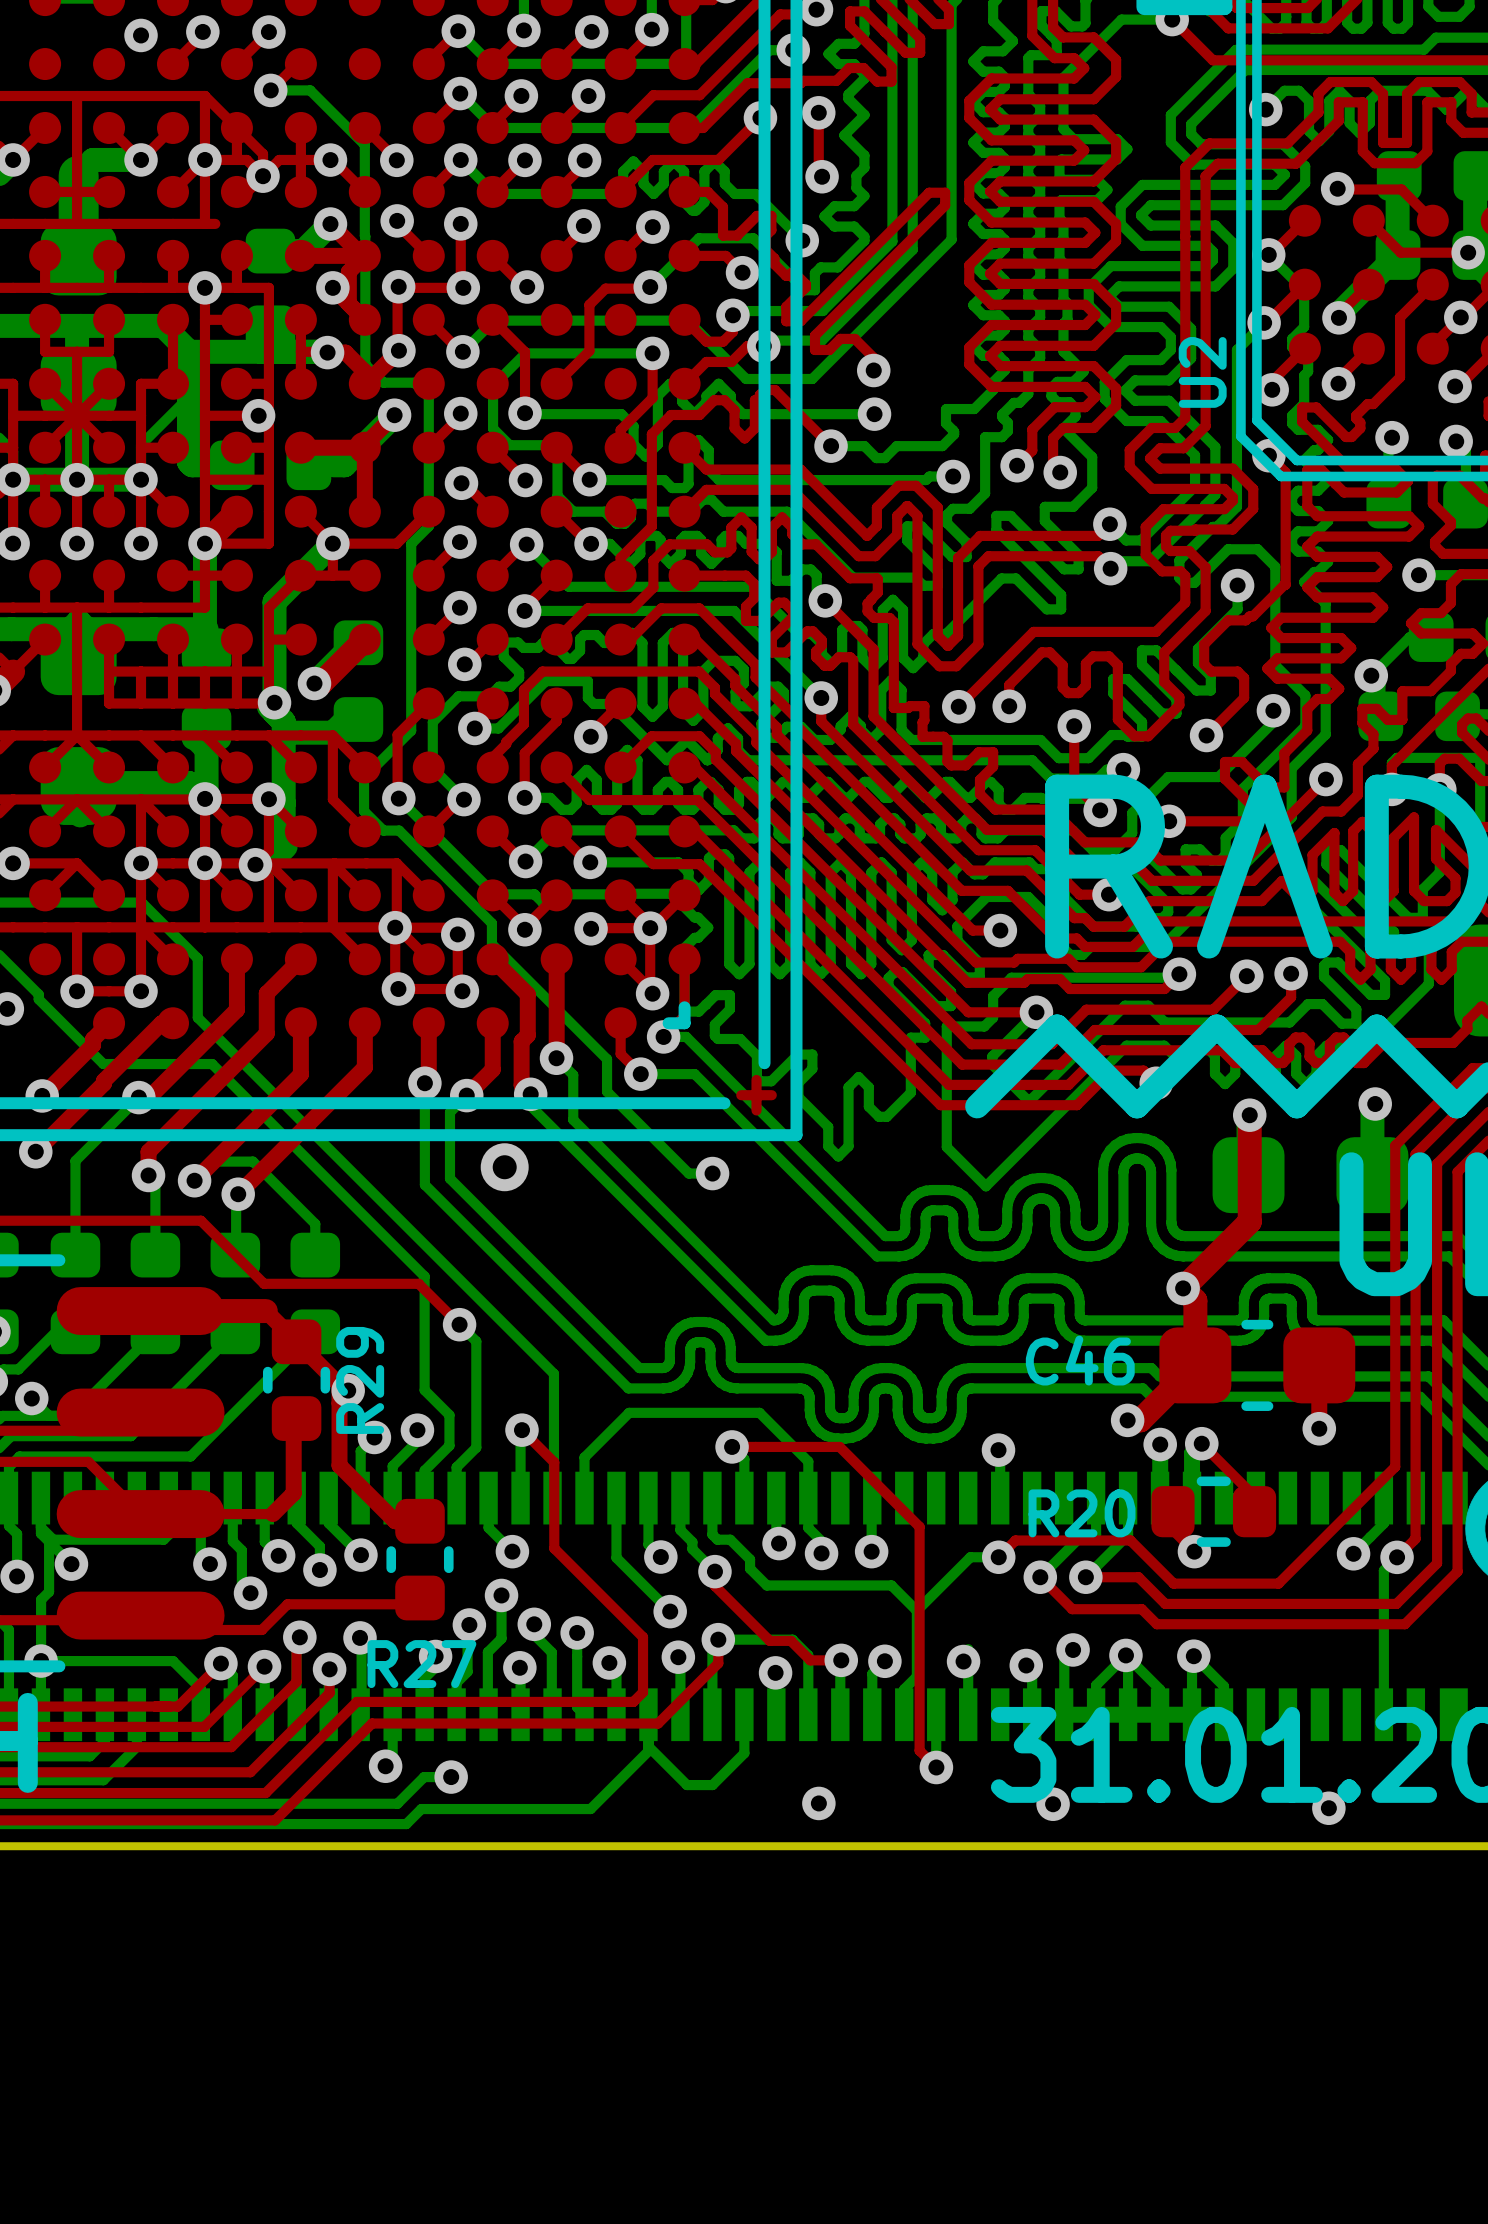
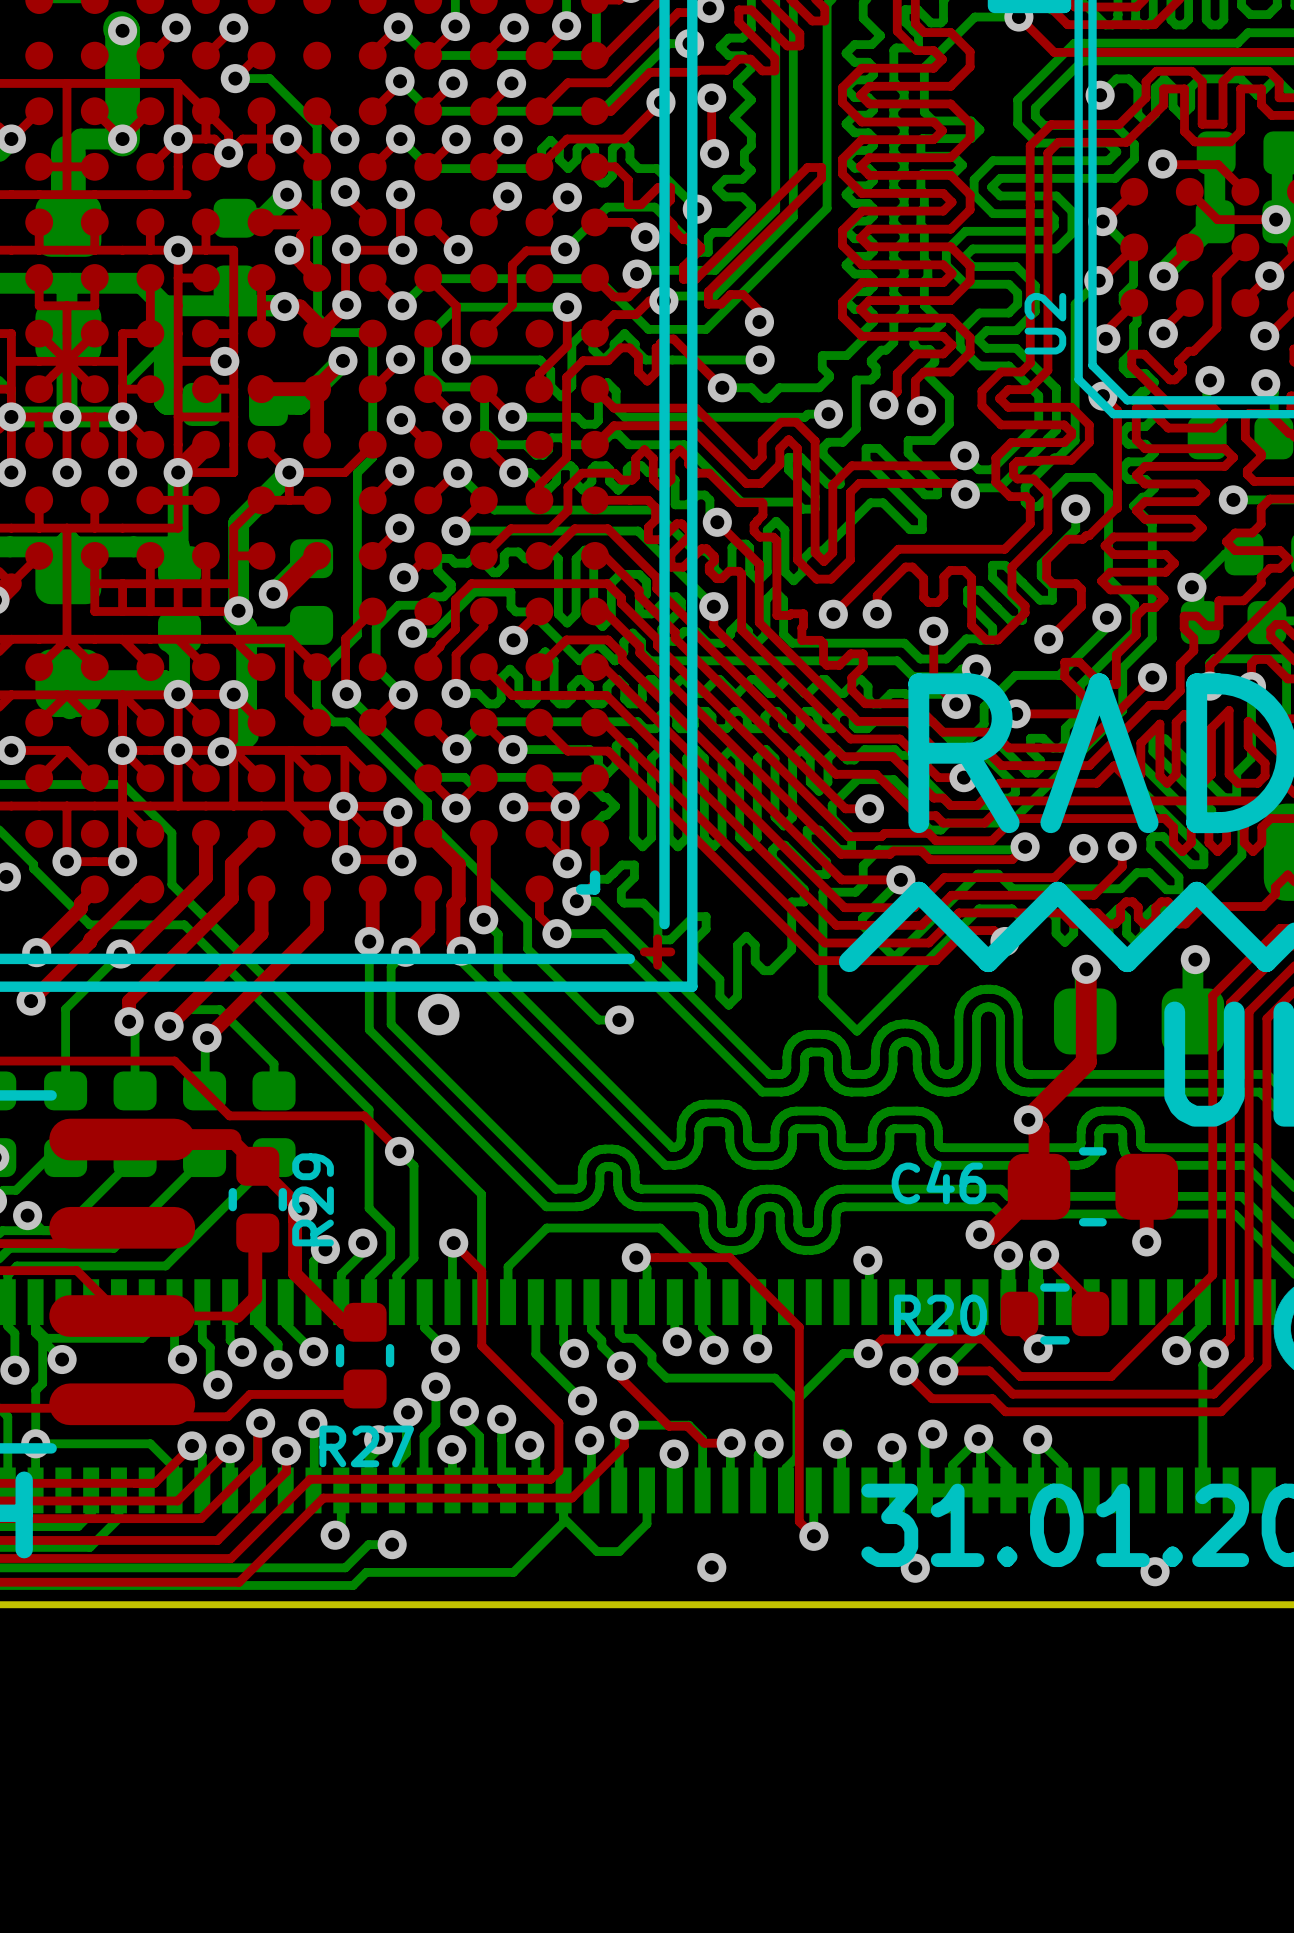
bottom track: none -> (120, 28) (122, 30) (122, 139)

